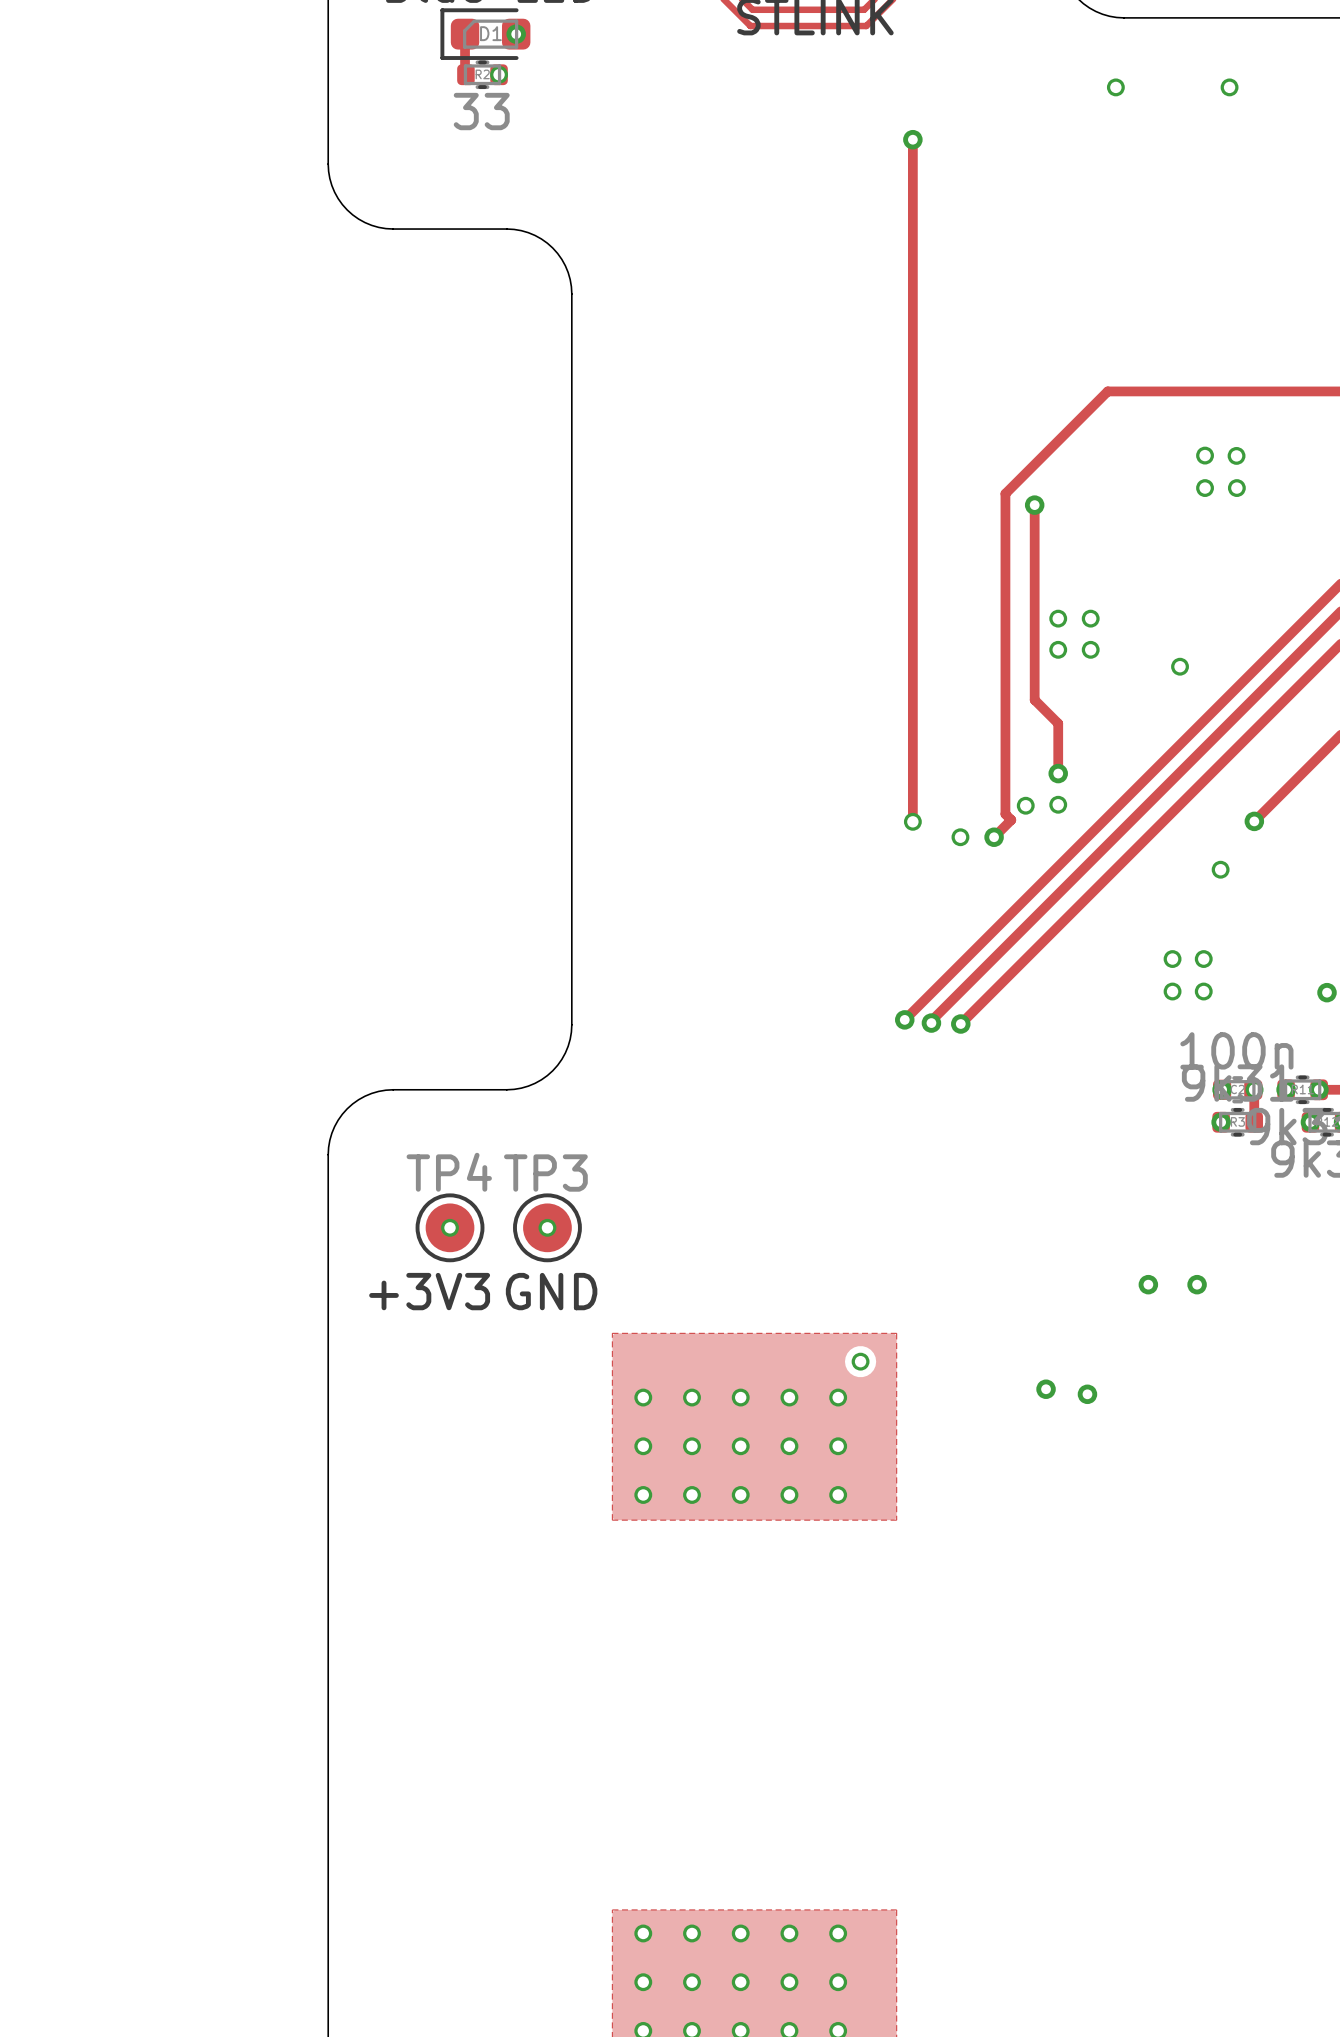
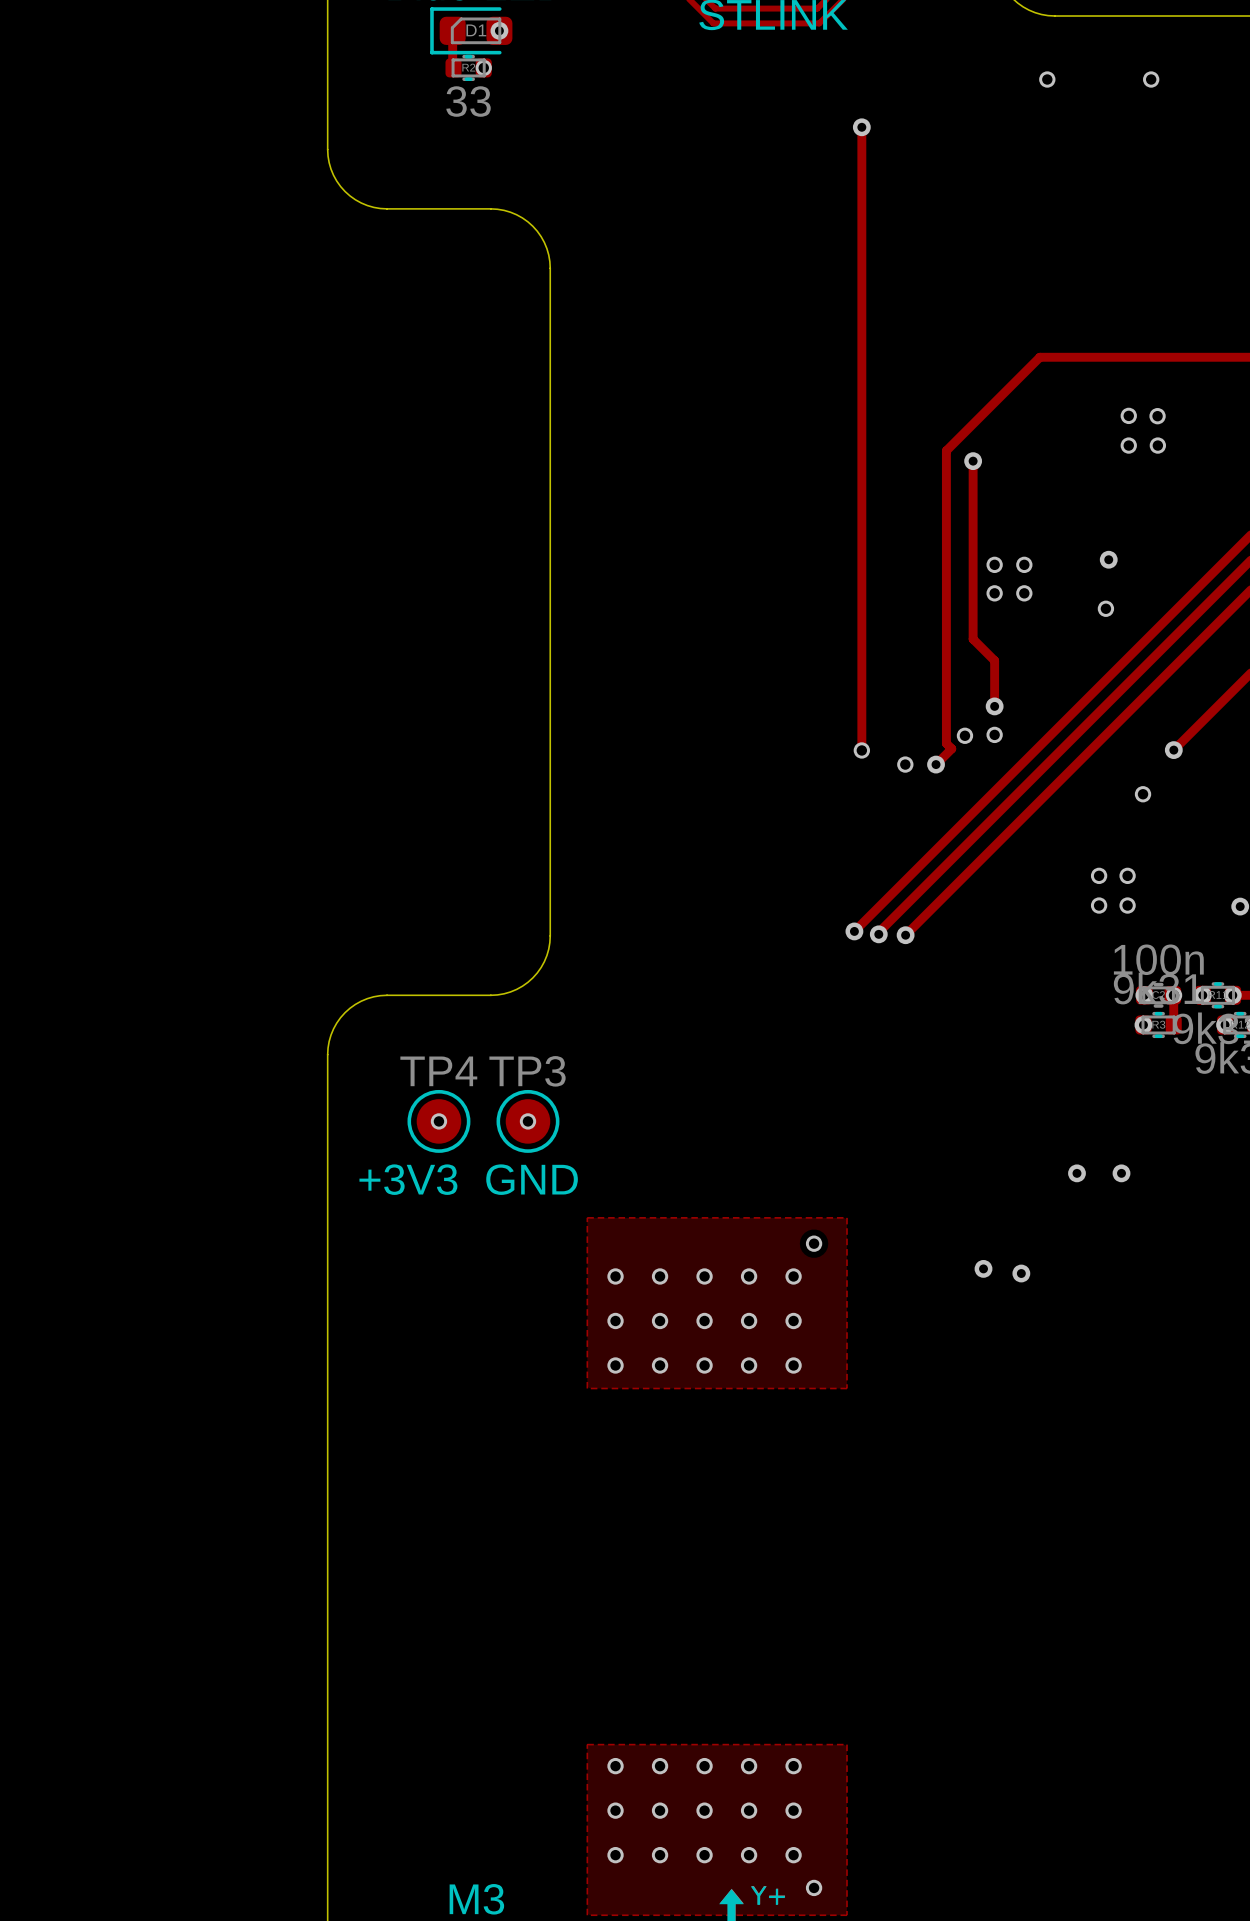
via: none -> (1108, 559)

